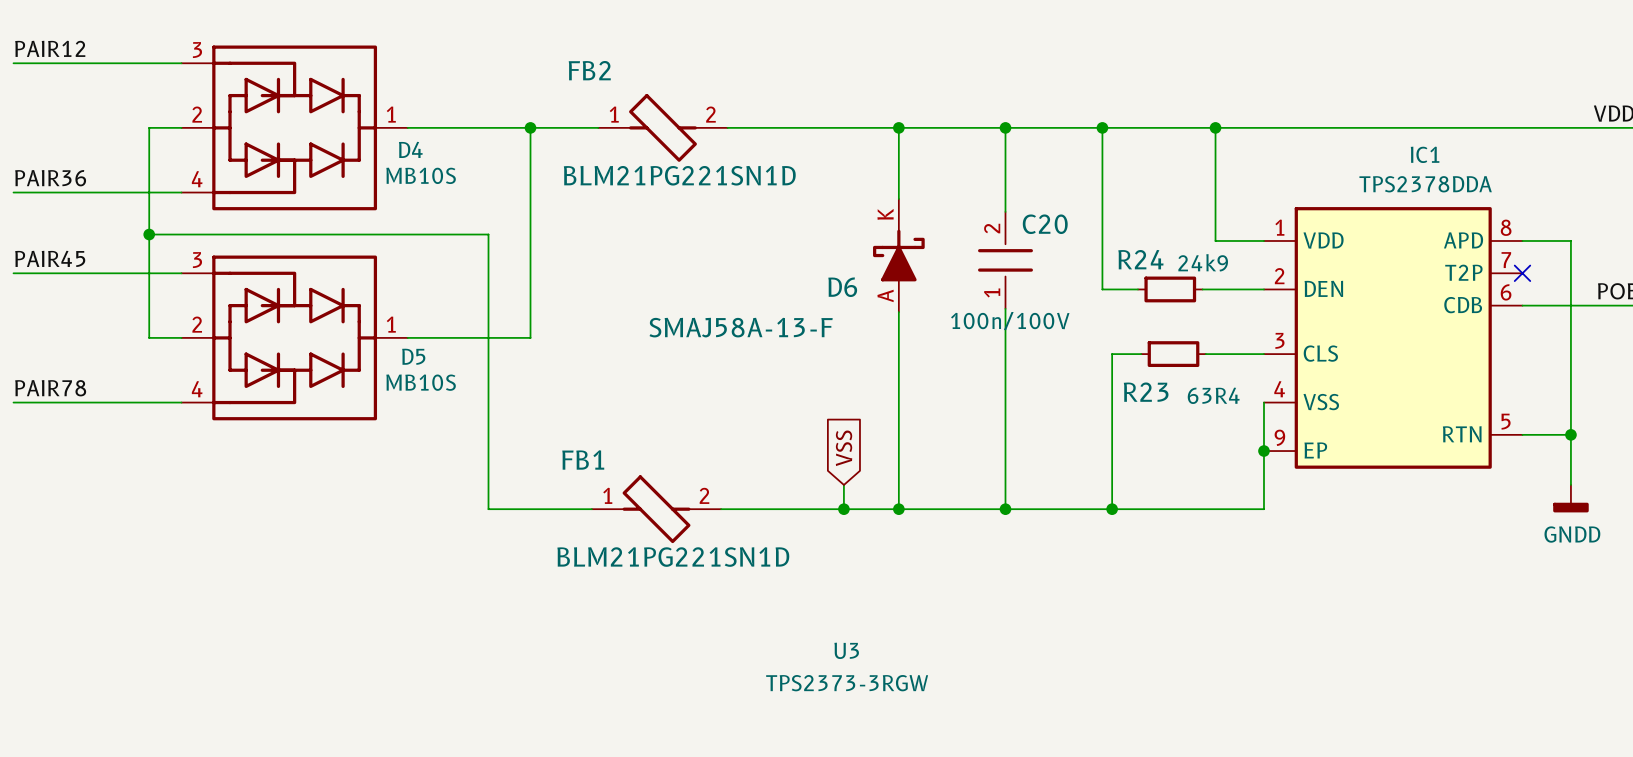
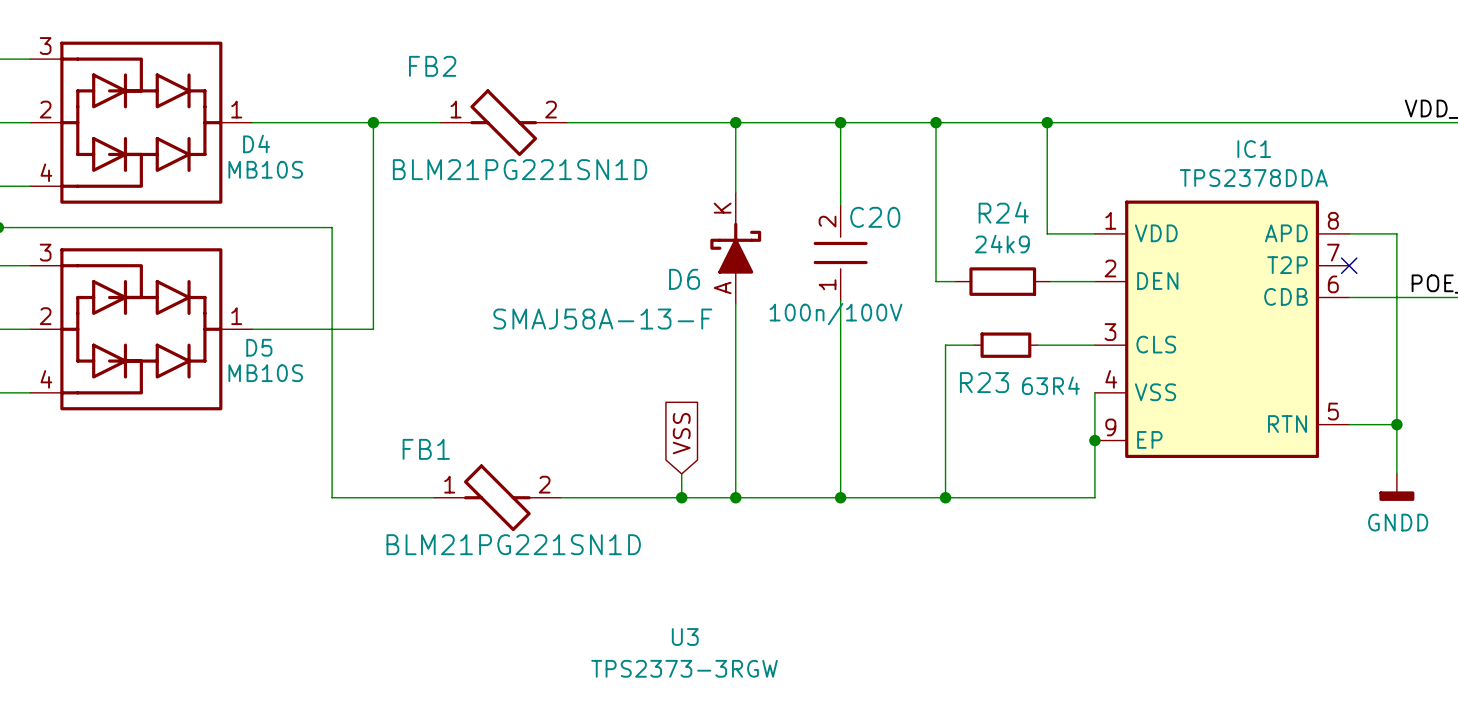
R24 name position: R24 (1140, 259) -> R24 (1003, 212)
R24 text position: 24k9 (1203, 262) -> 24k9 (1002, 244)
R24 symbol: [1137, 276, 1203, 303] -> [955, 267, 1051, 296]

